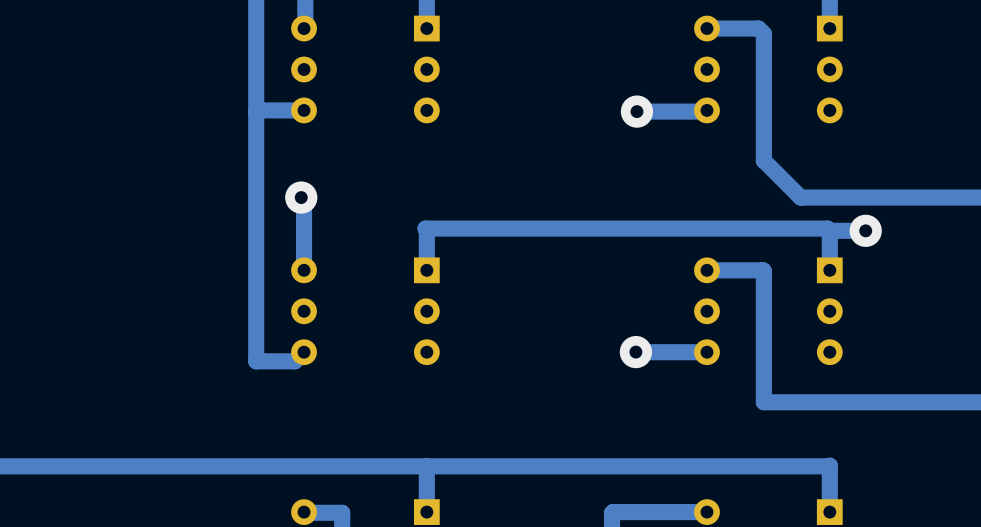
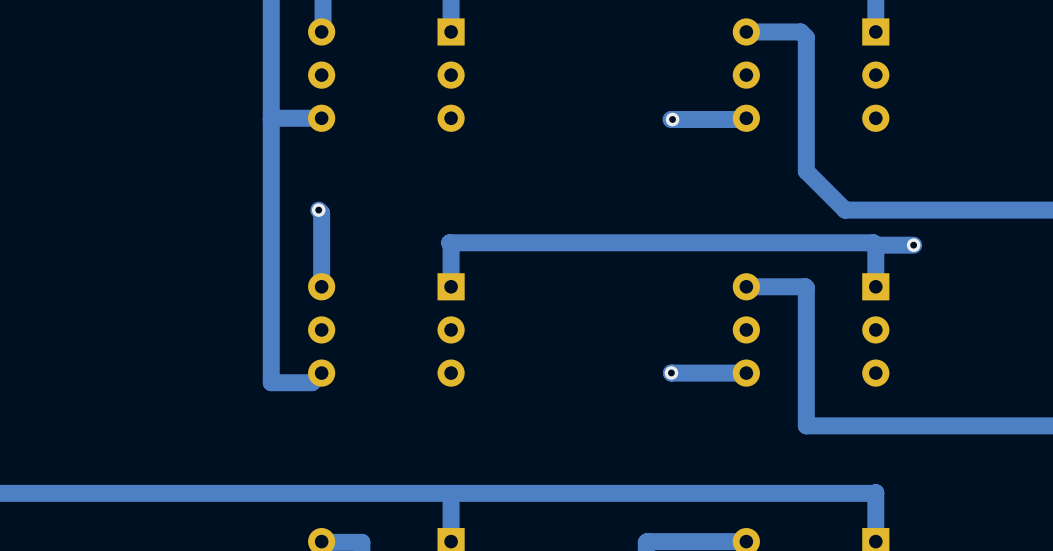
via size: [620, 95, 654, 128] -> [665, 112, 680, 127]
via size: [285, 181, 318, 214] -> [311, 203, 326, 217]
via size: [849, 214, 882, 247] -> [906, 238, 921, 252]
via size: [619, 335, 653, 369] -> [664, 366, 679, 380]

